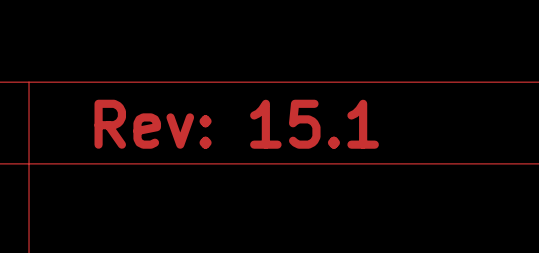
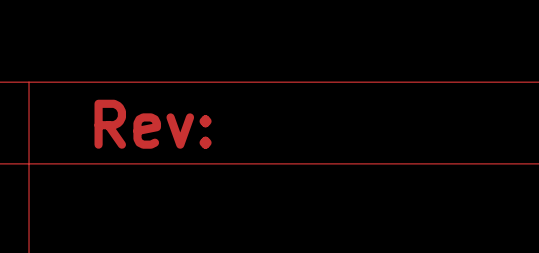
title block: Rev: 15.1 (236, 124) -> Rev: (153, 124)

